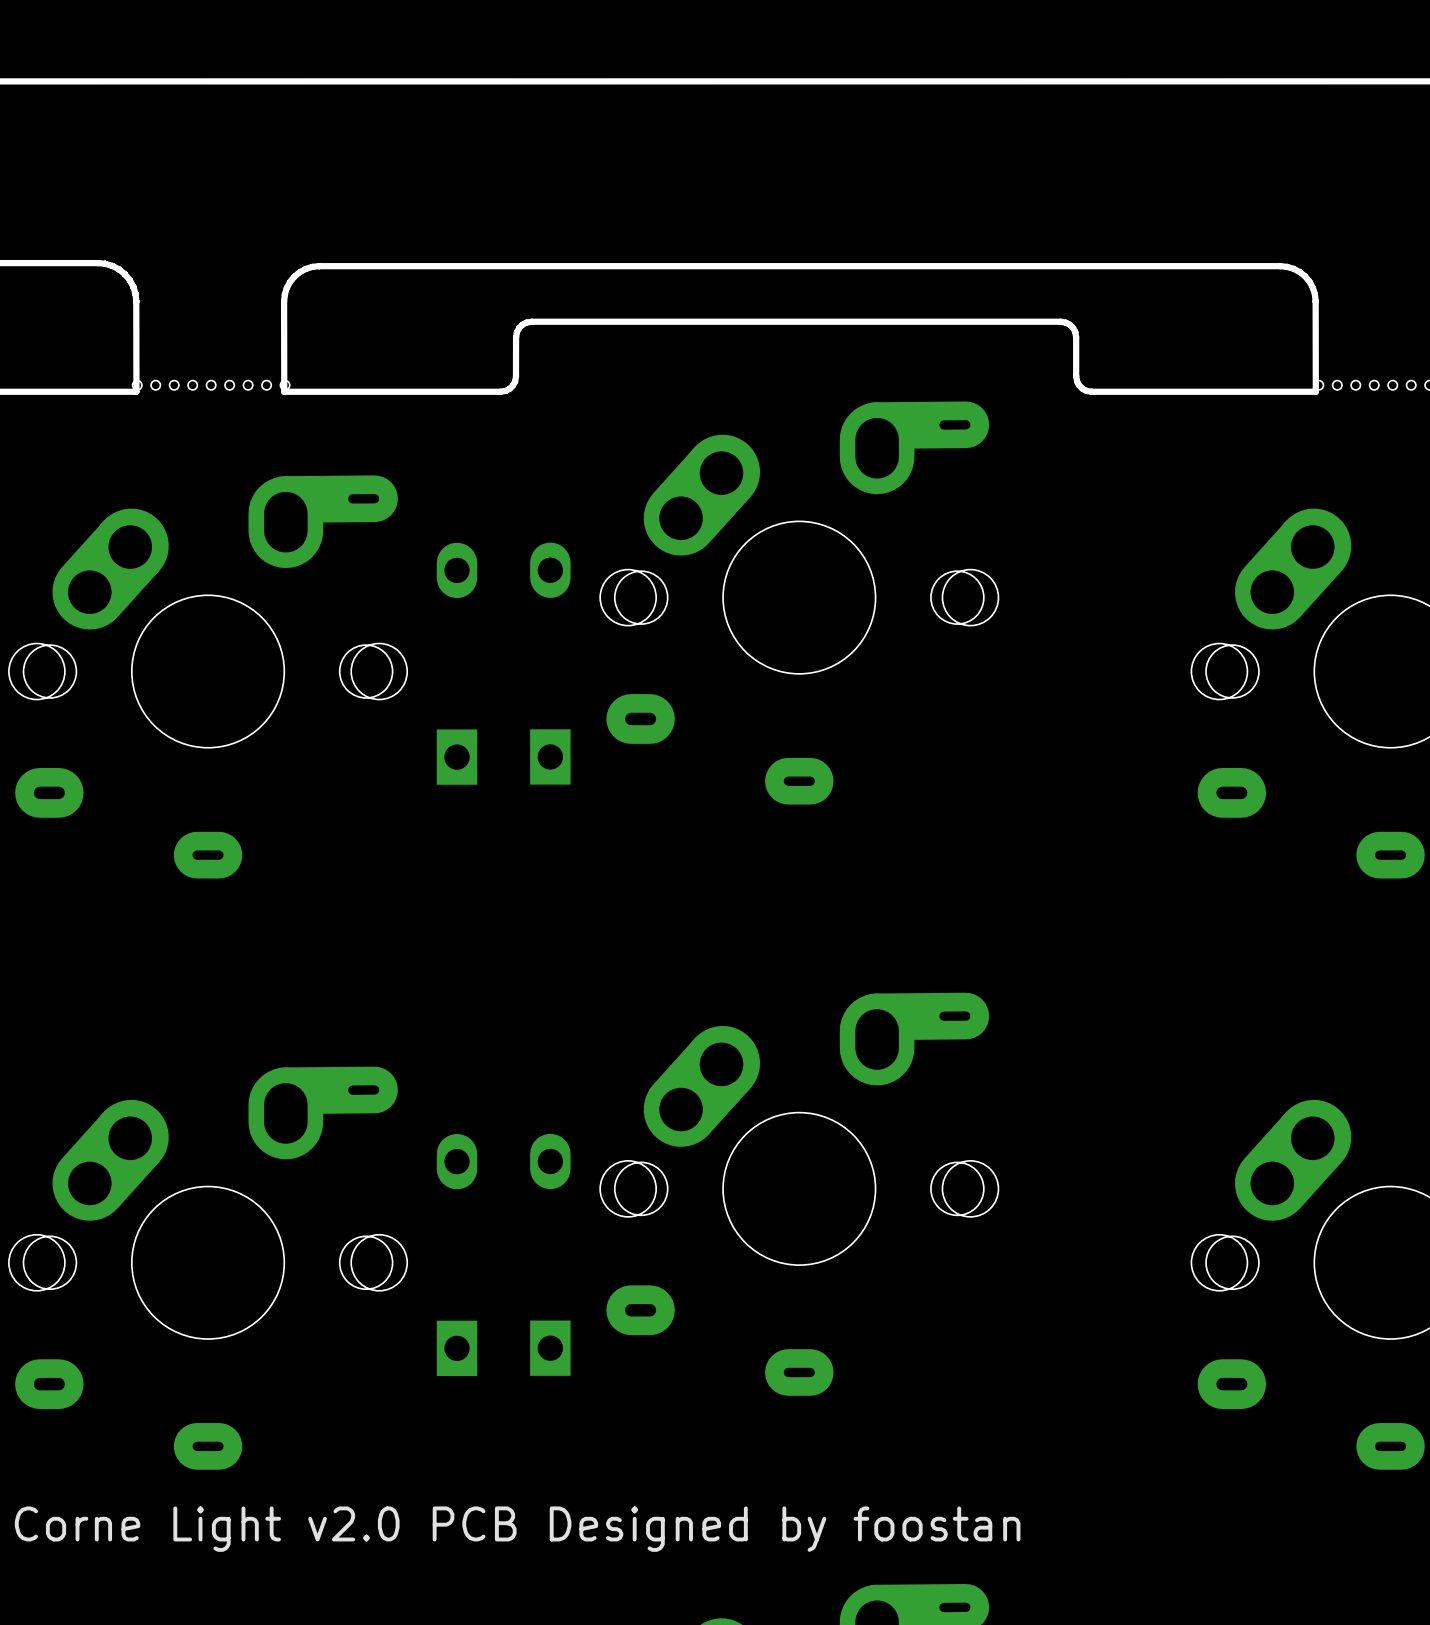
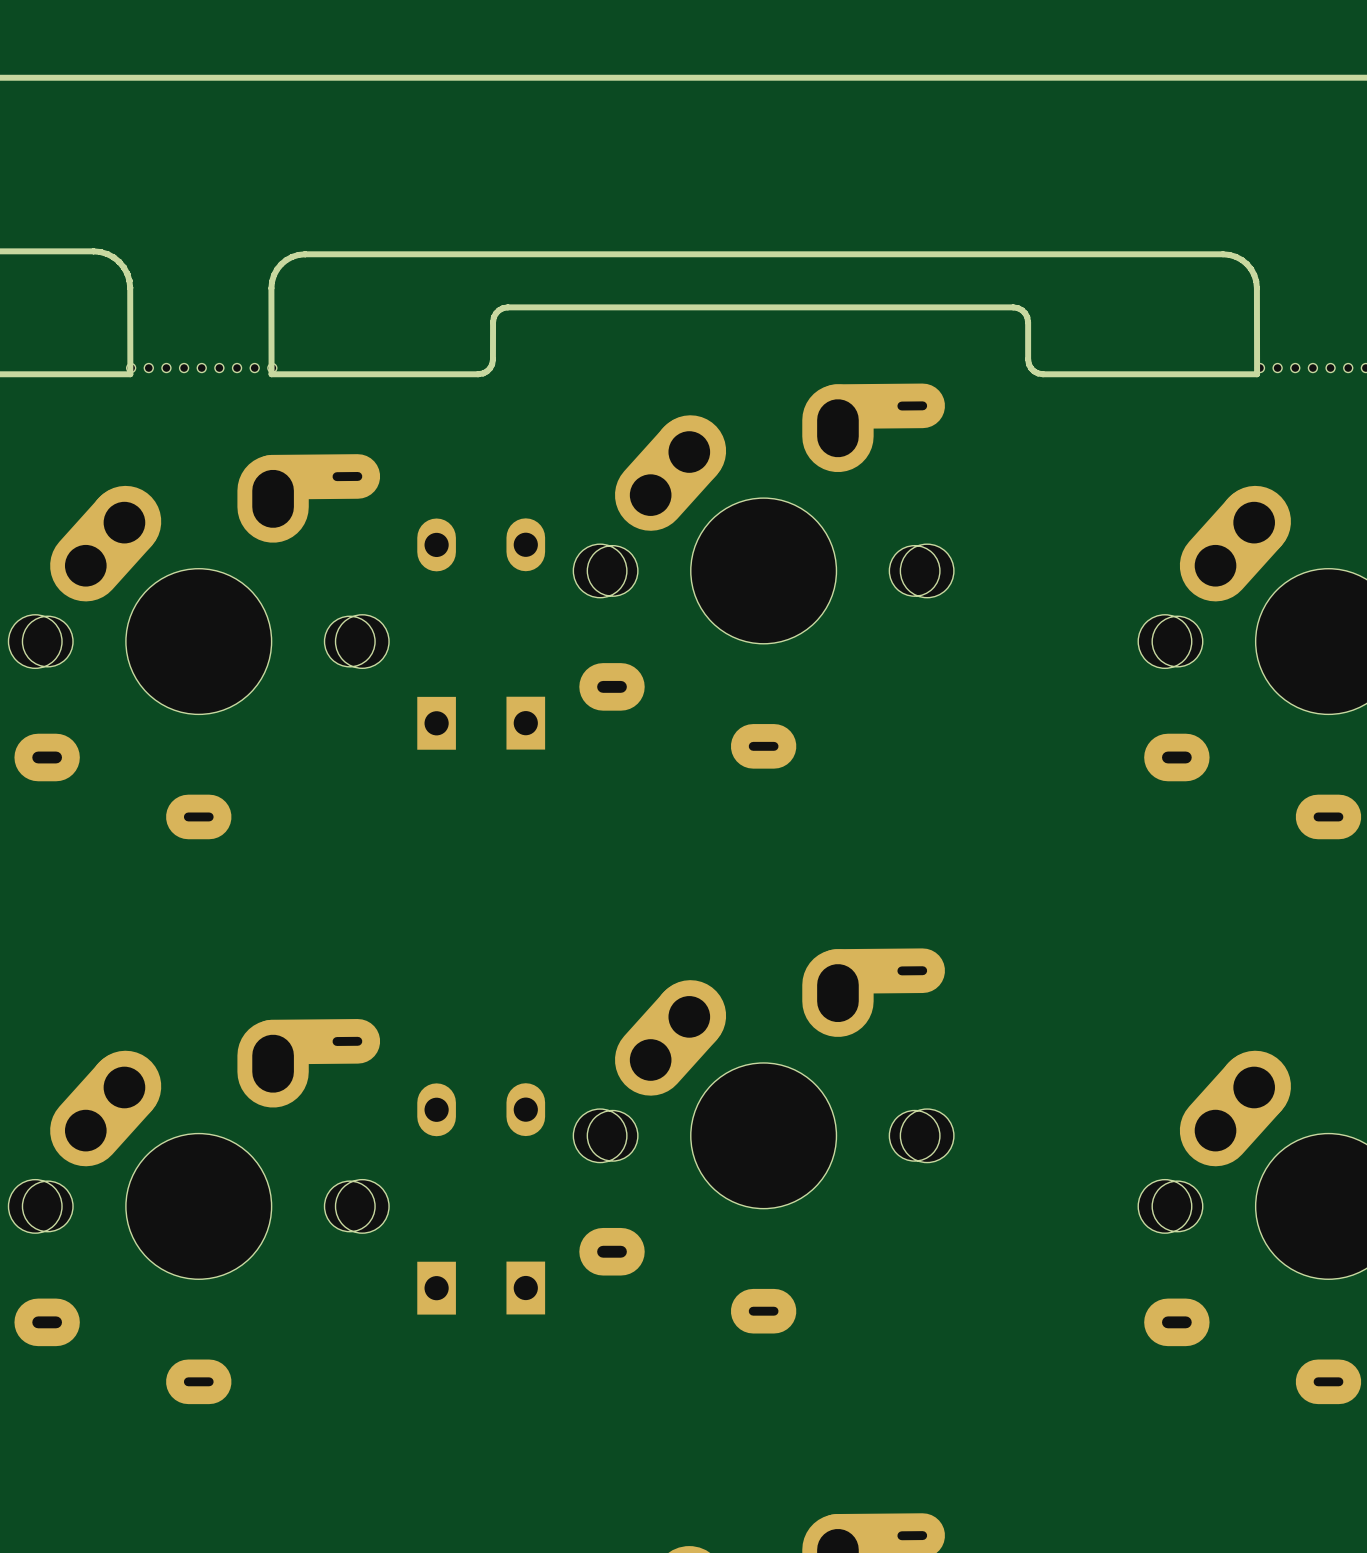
text: Corne Light v2.0 PCB Designed by foostan (517, 1529) -> none

